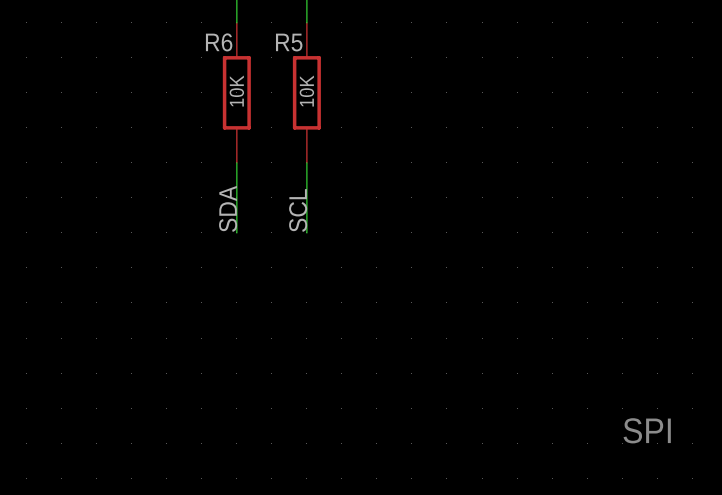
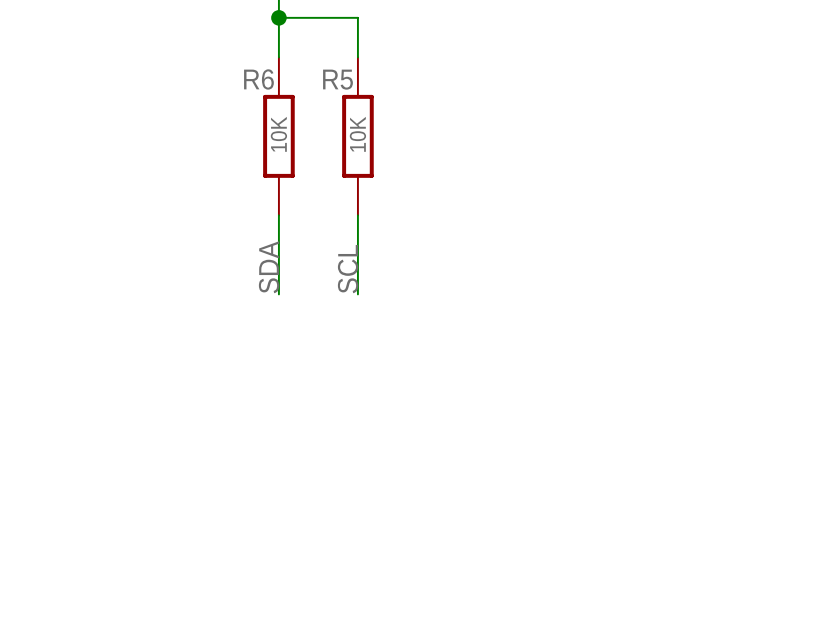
text: SPI (647, 430) -> none

